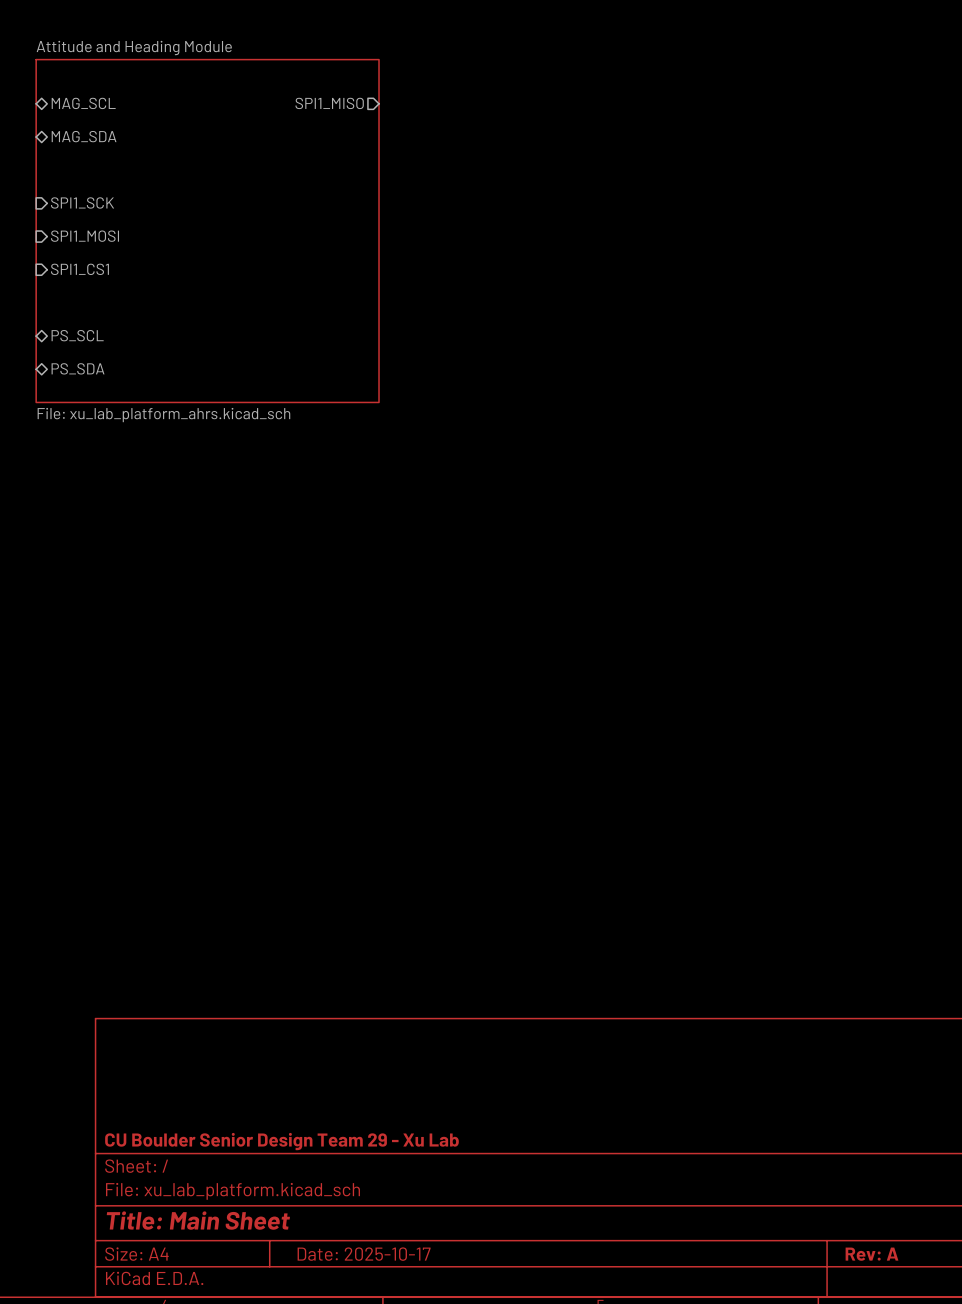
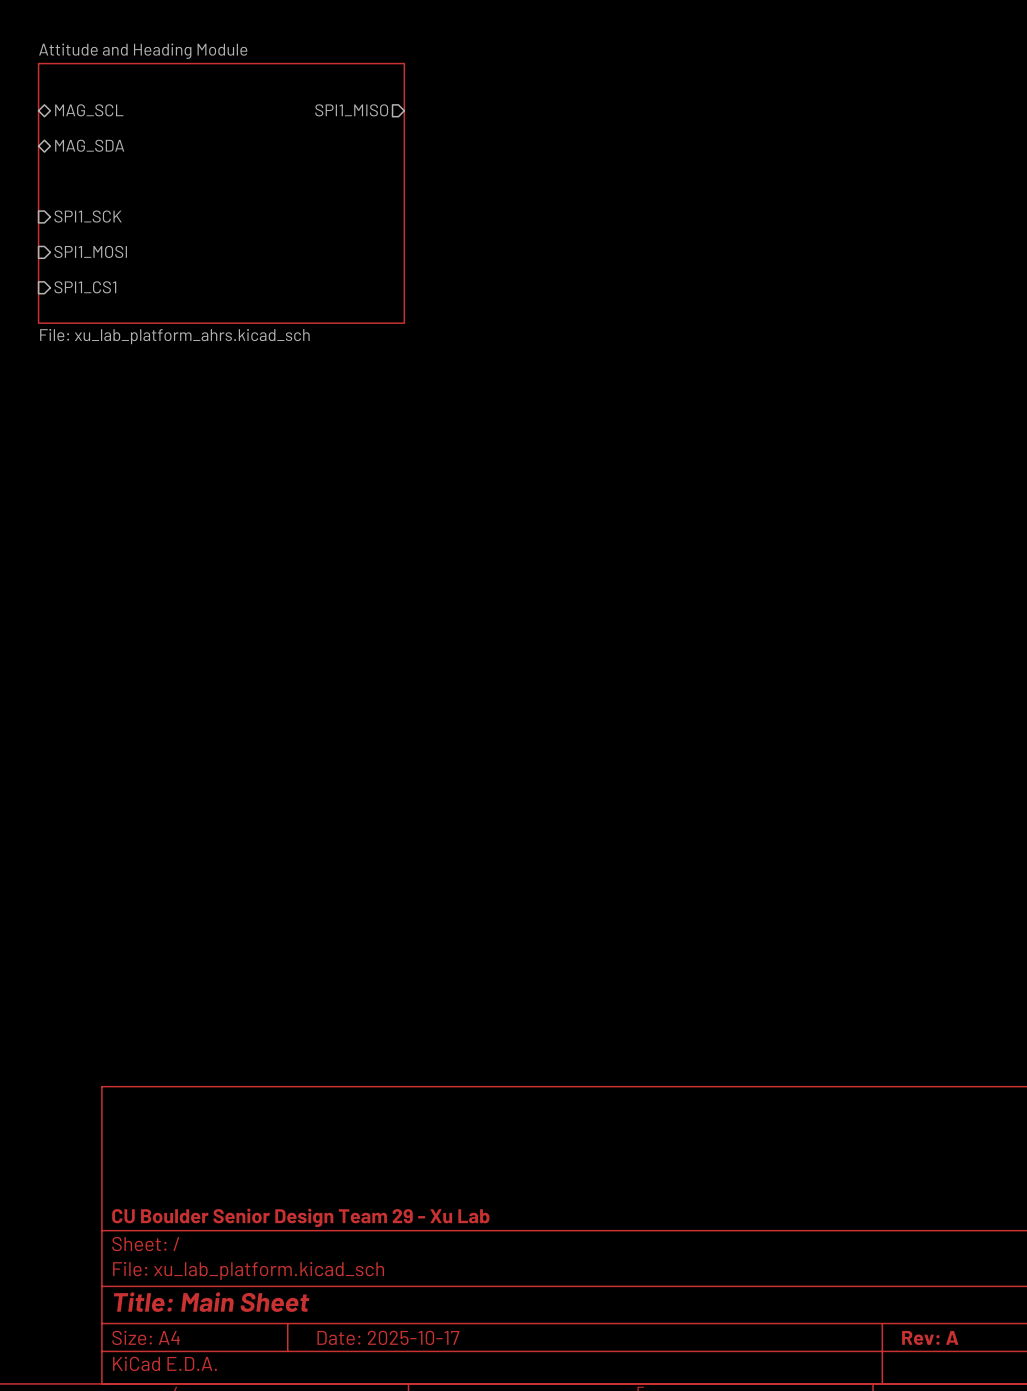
sheet Attitude and Heading Module: none -> File: xu_lab_platform_ahrs.kicad_sch (221, 193)
sheet Attitude and Heading Module: File: xu_lab_platform_ahrs.kicad_sch (207, 231) -> none
sheet pin: PS_SCL (77, 335) -> none
sheet pin: PS_SDA (78, 368) -> none

